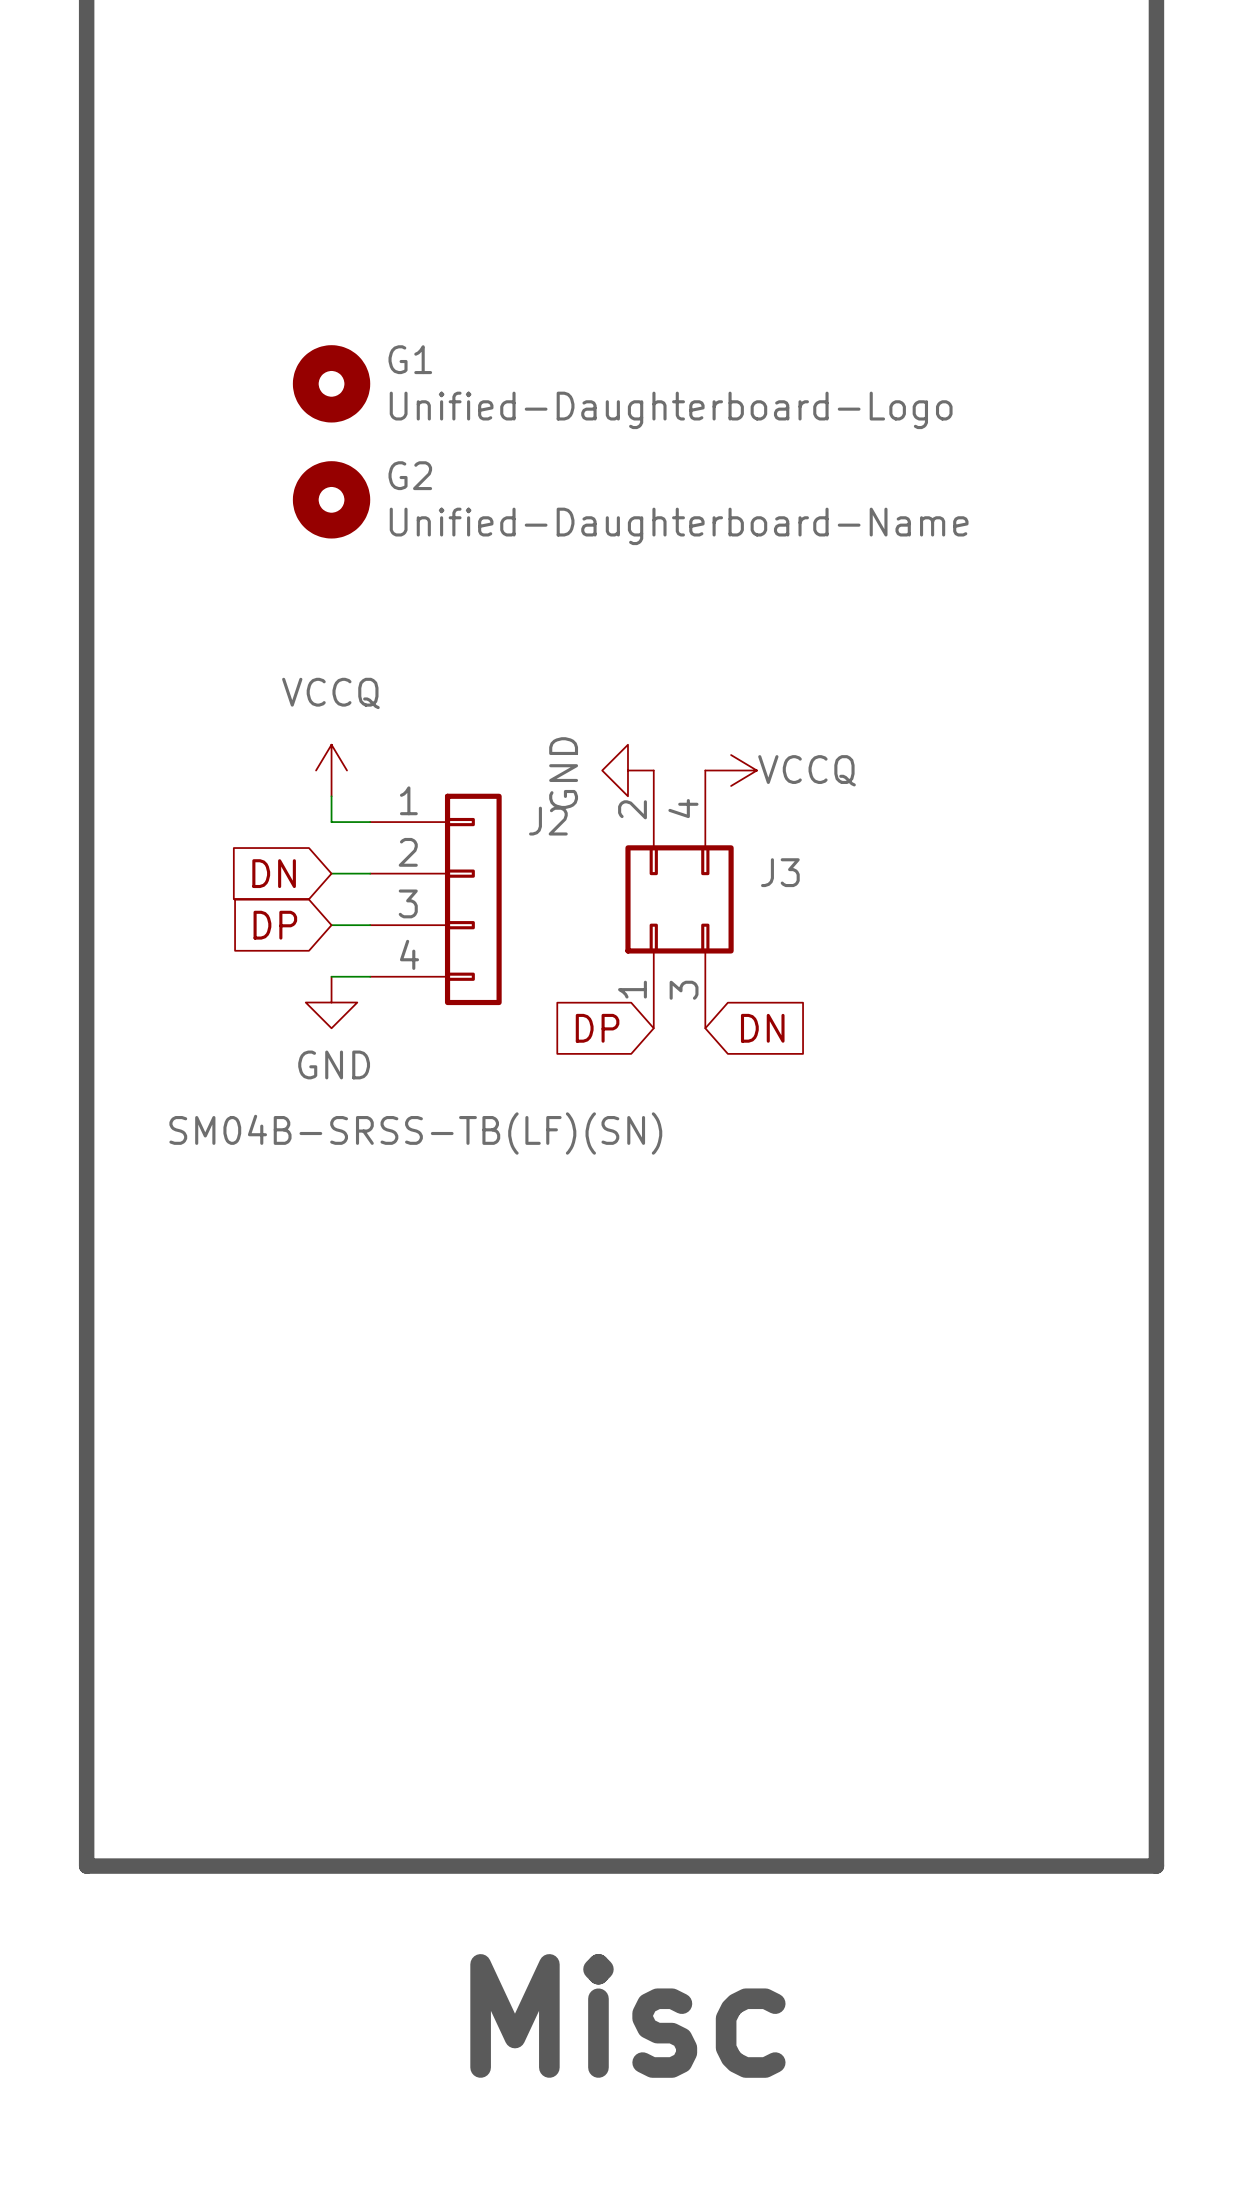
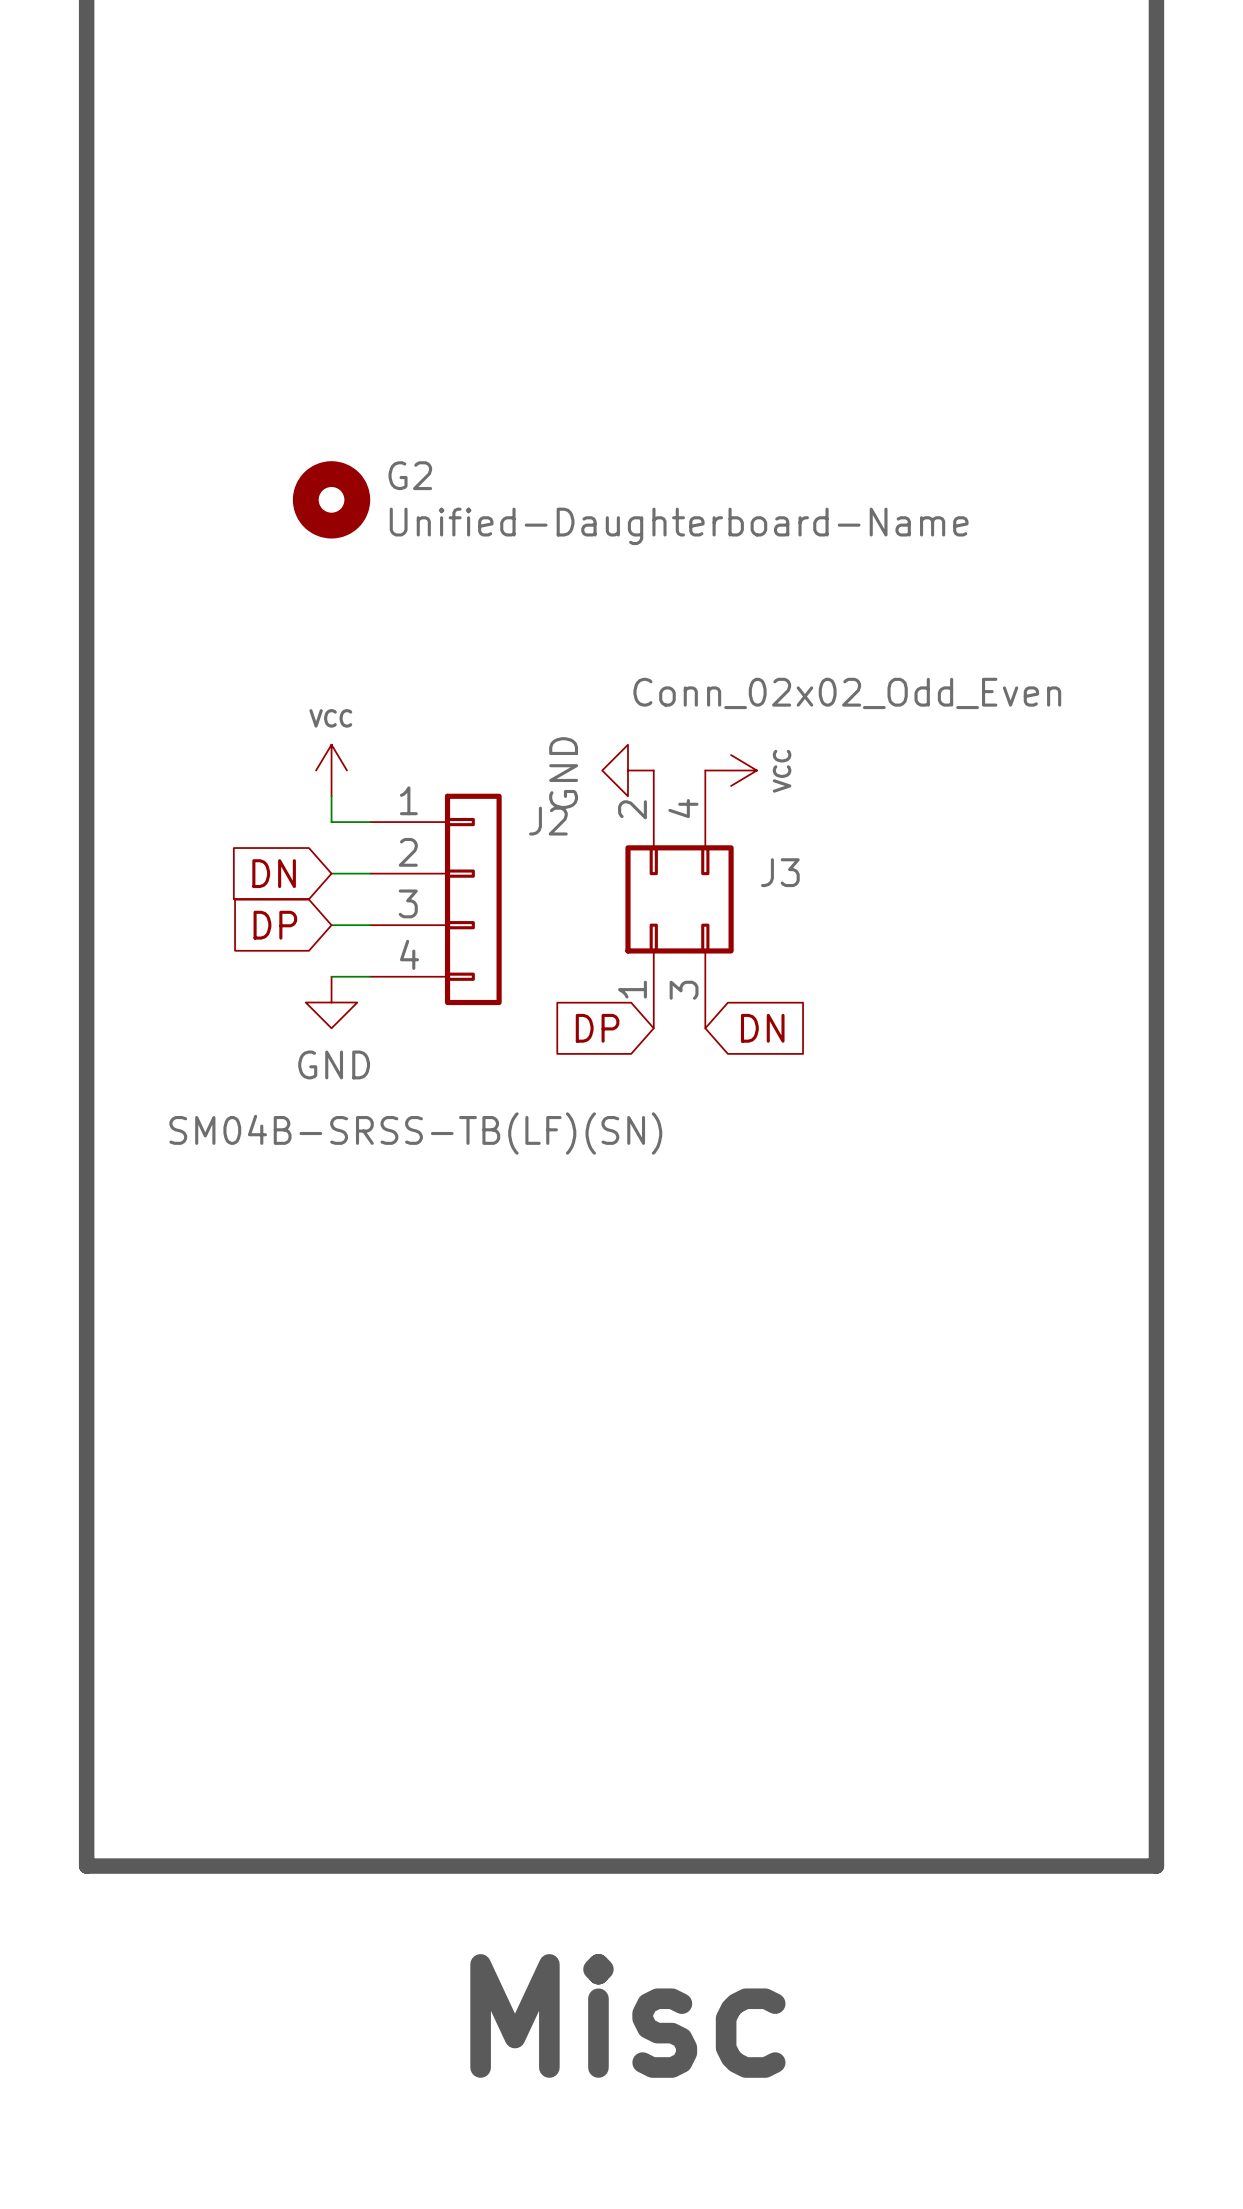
G1: Unified-Daughterboard-Logo (331, 383) -> none
J3 value: none -> Conn_02x02_Odd_Even (847, 693)
power symbol: VCCQ (331, 770) -> VCC (331, 770)
power symbol: VCCQ (731, 770) -> VCC (731, 770)

